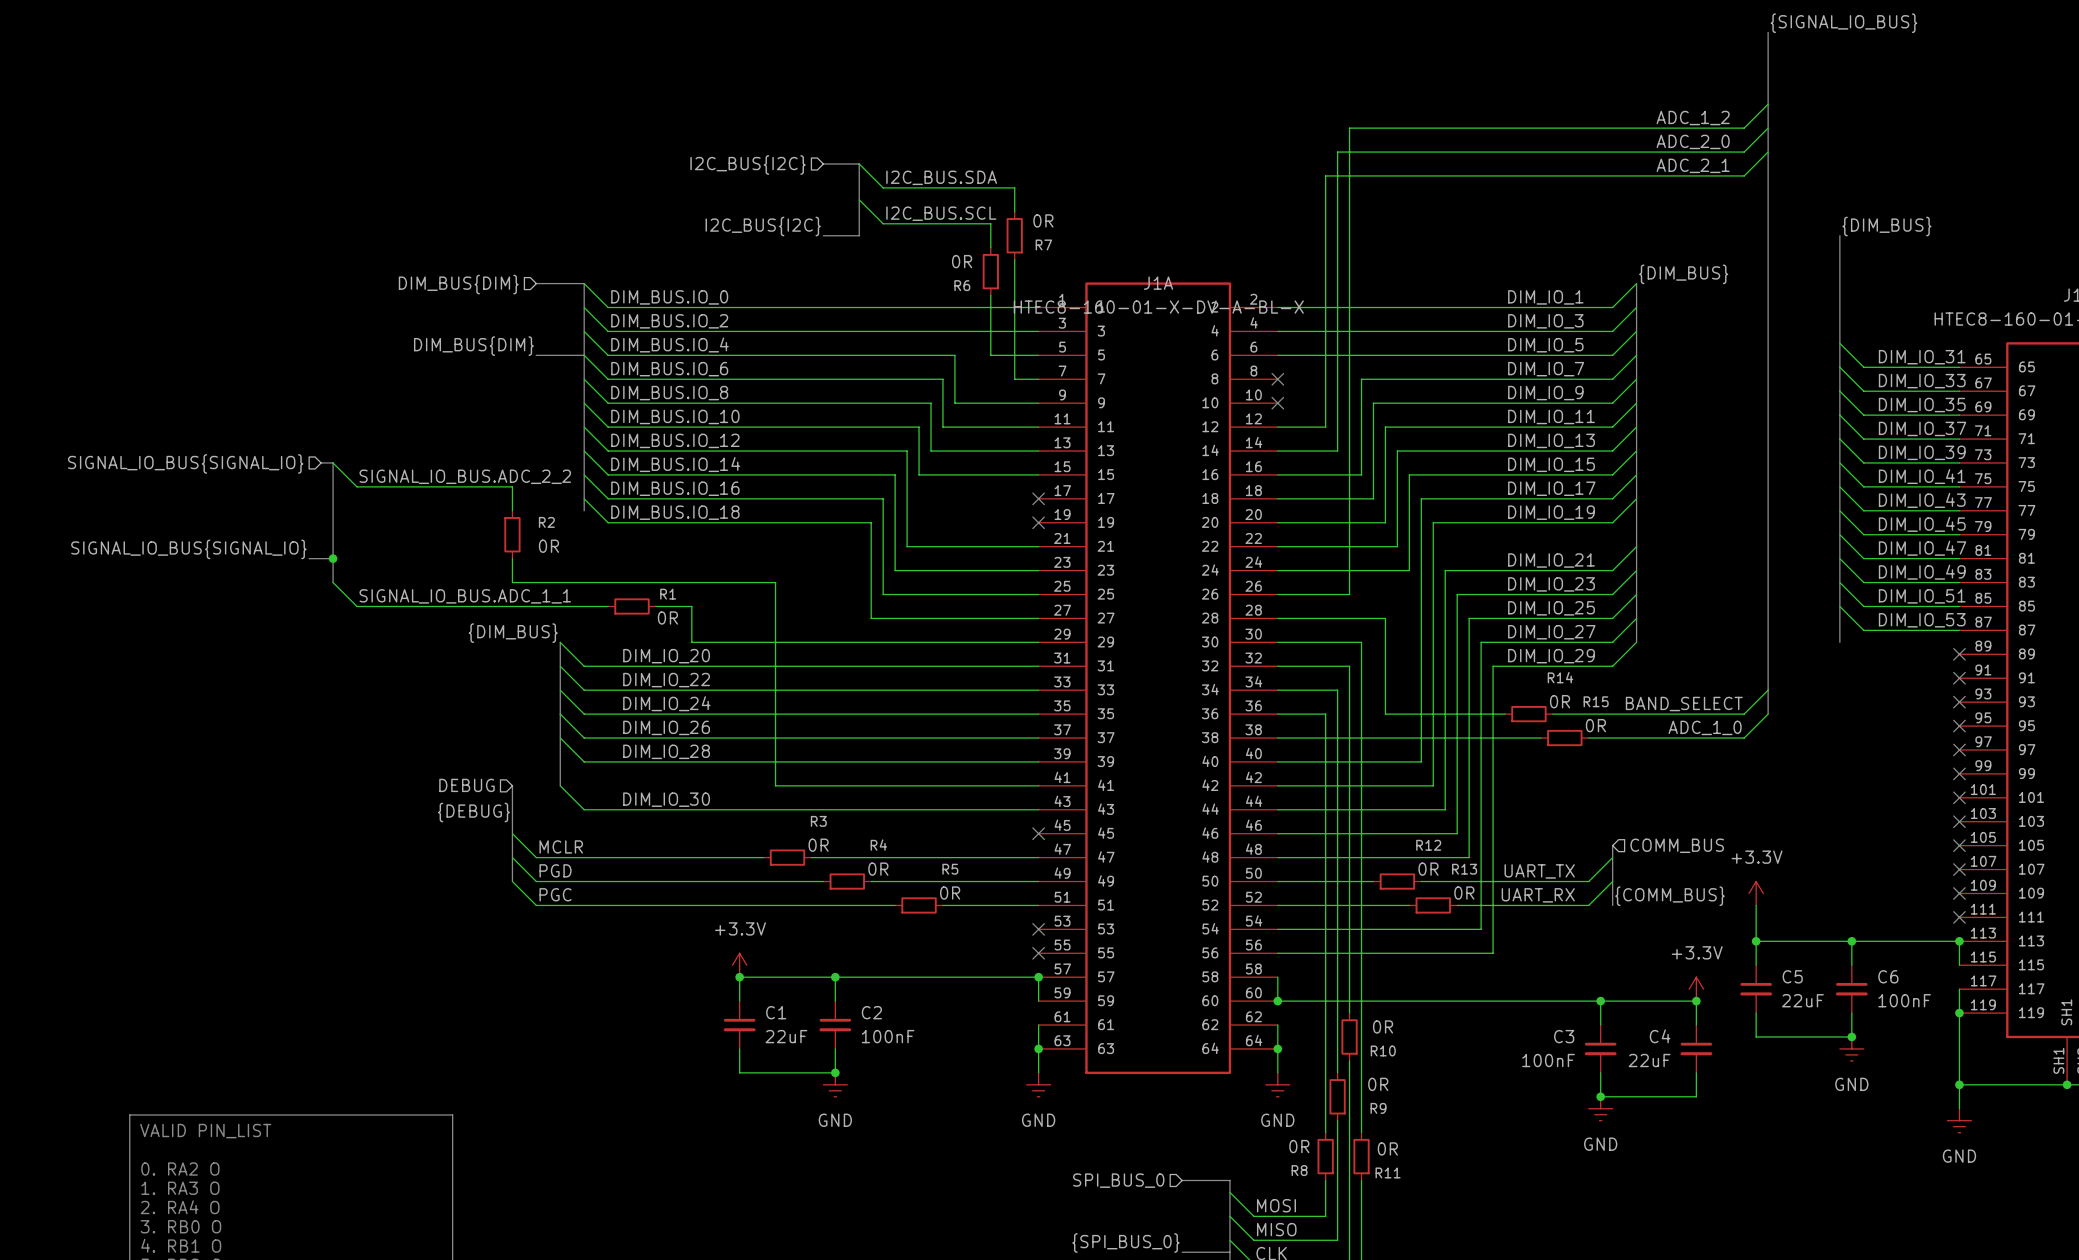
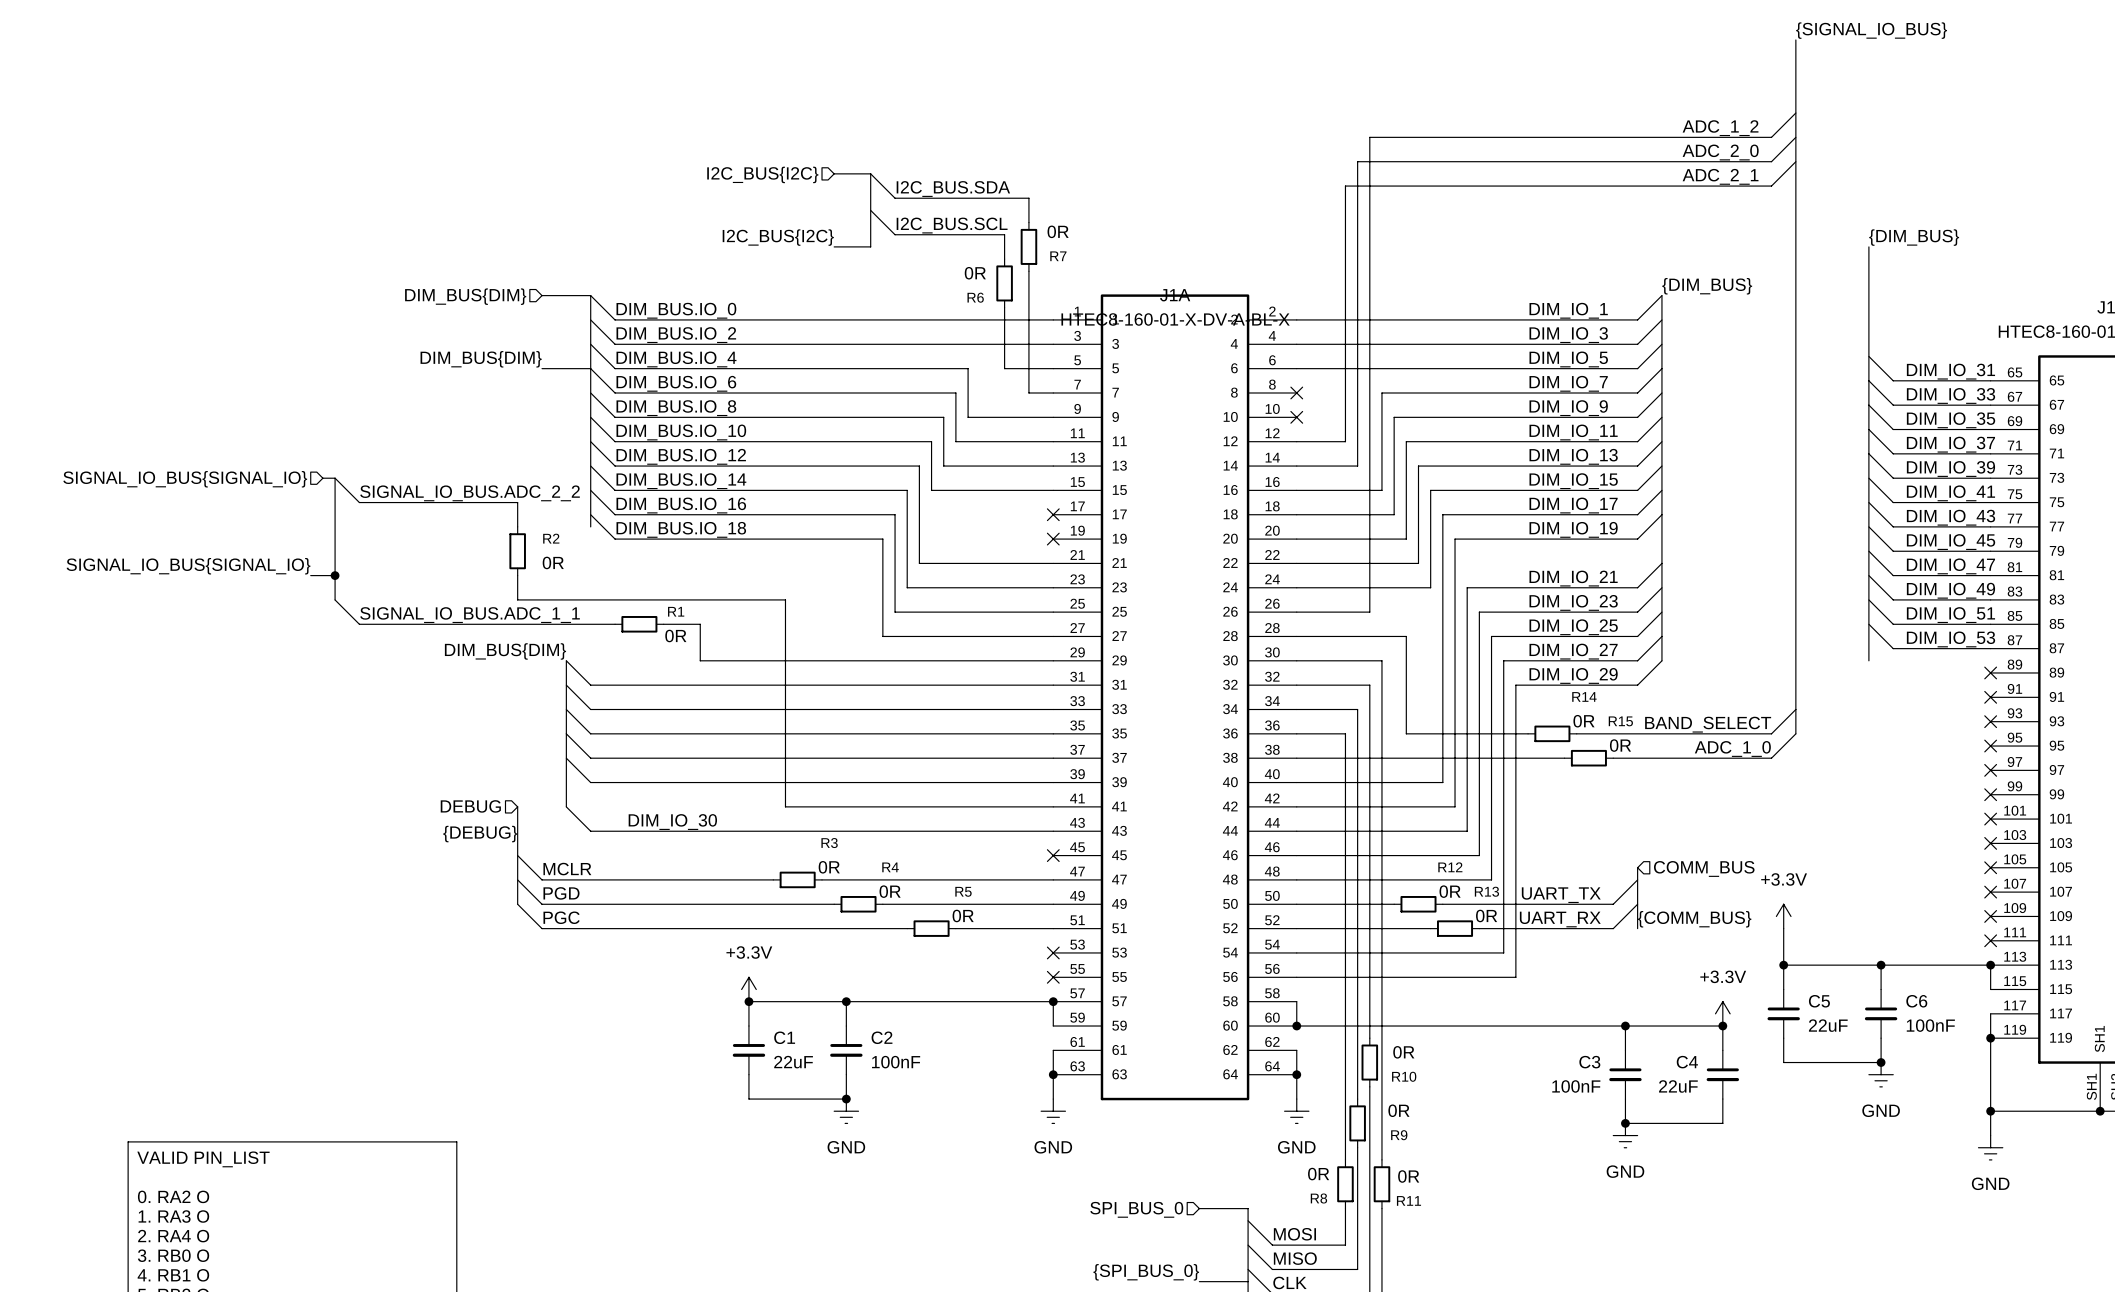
label: {DIM_BUS} (513, 633) -> DIM_BUS{DIM} (505, 651)
label: DIM_IO_20 (666, 656) -> none
label: DIM_IO_22 (666, 680) -> none
label: DIM_IO_24 (666, 703) -> none
label: DIM_IO_26 (666, 727) -> none
label: DIM_IO_28 (666, 751) -> none

